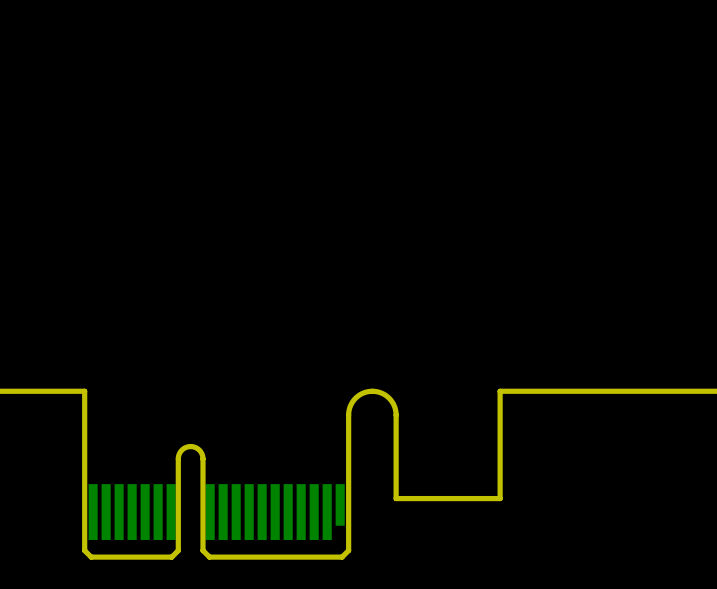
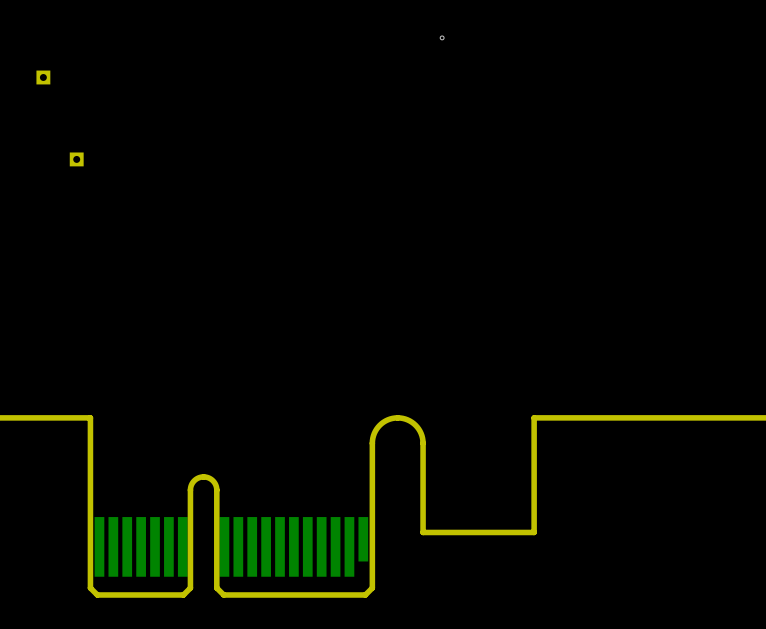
via: none -> (442, 37)
part: none -> (43, 77)
part: none -> (76, 159)

